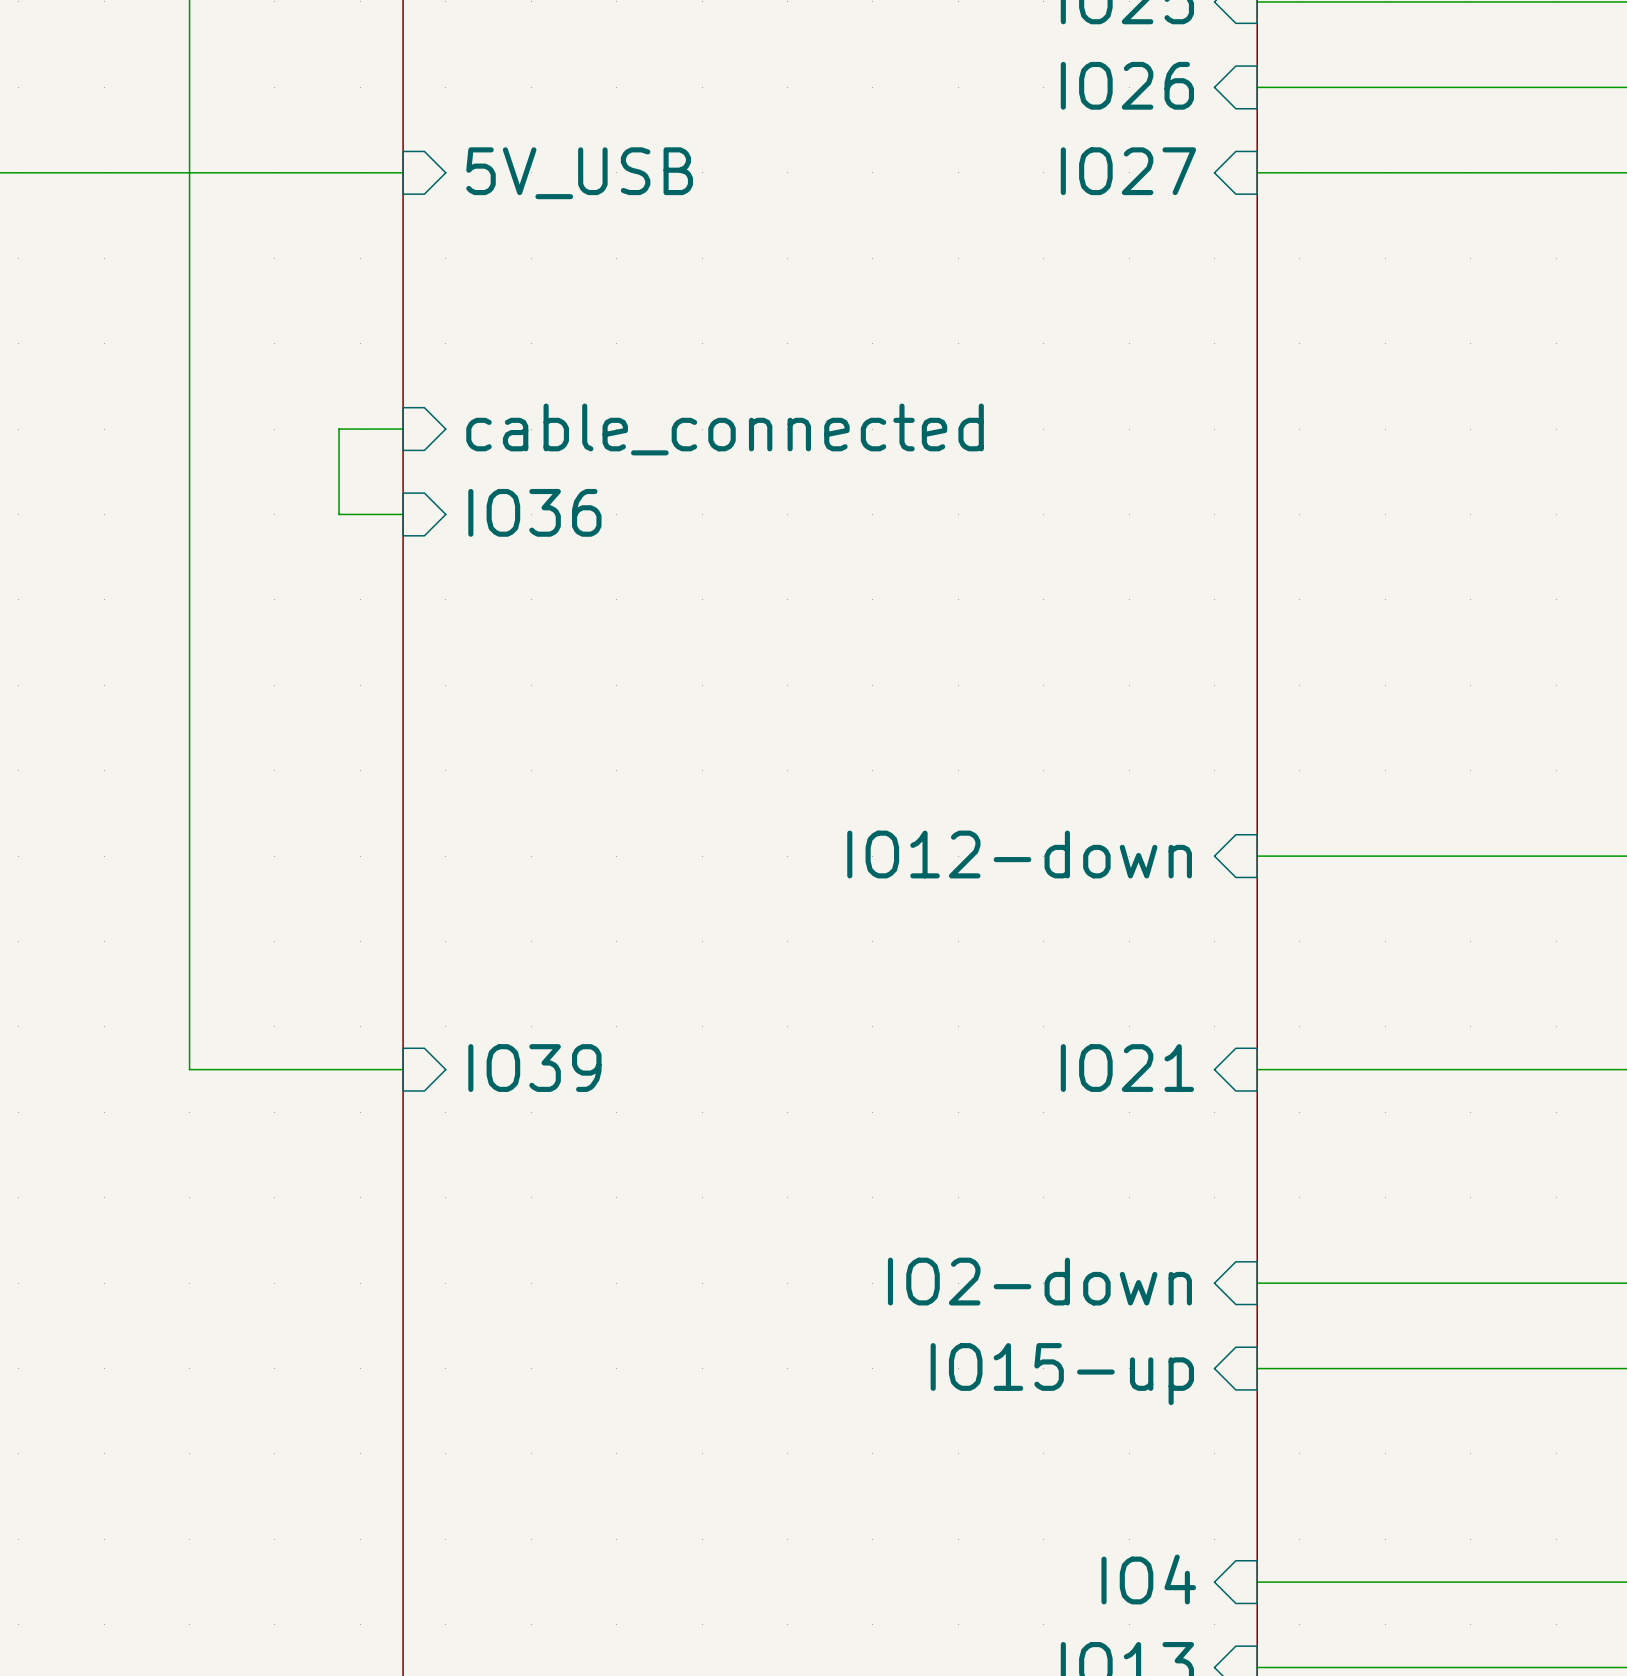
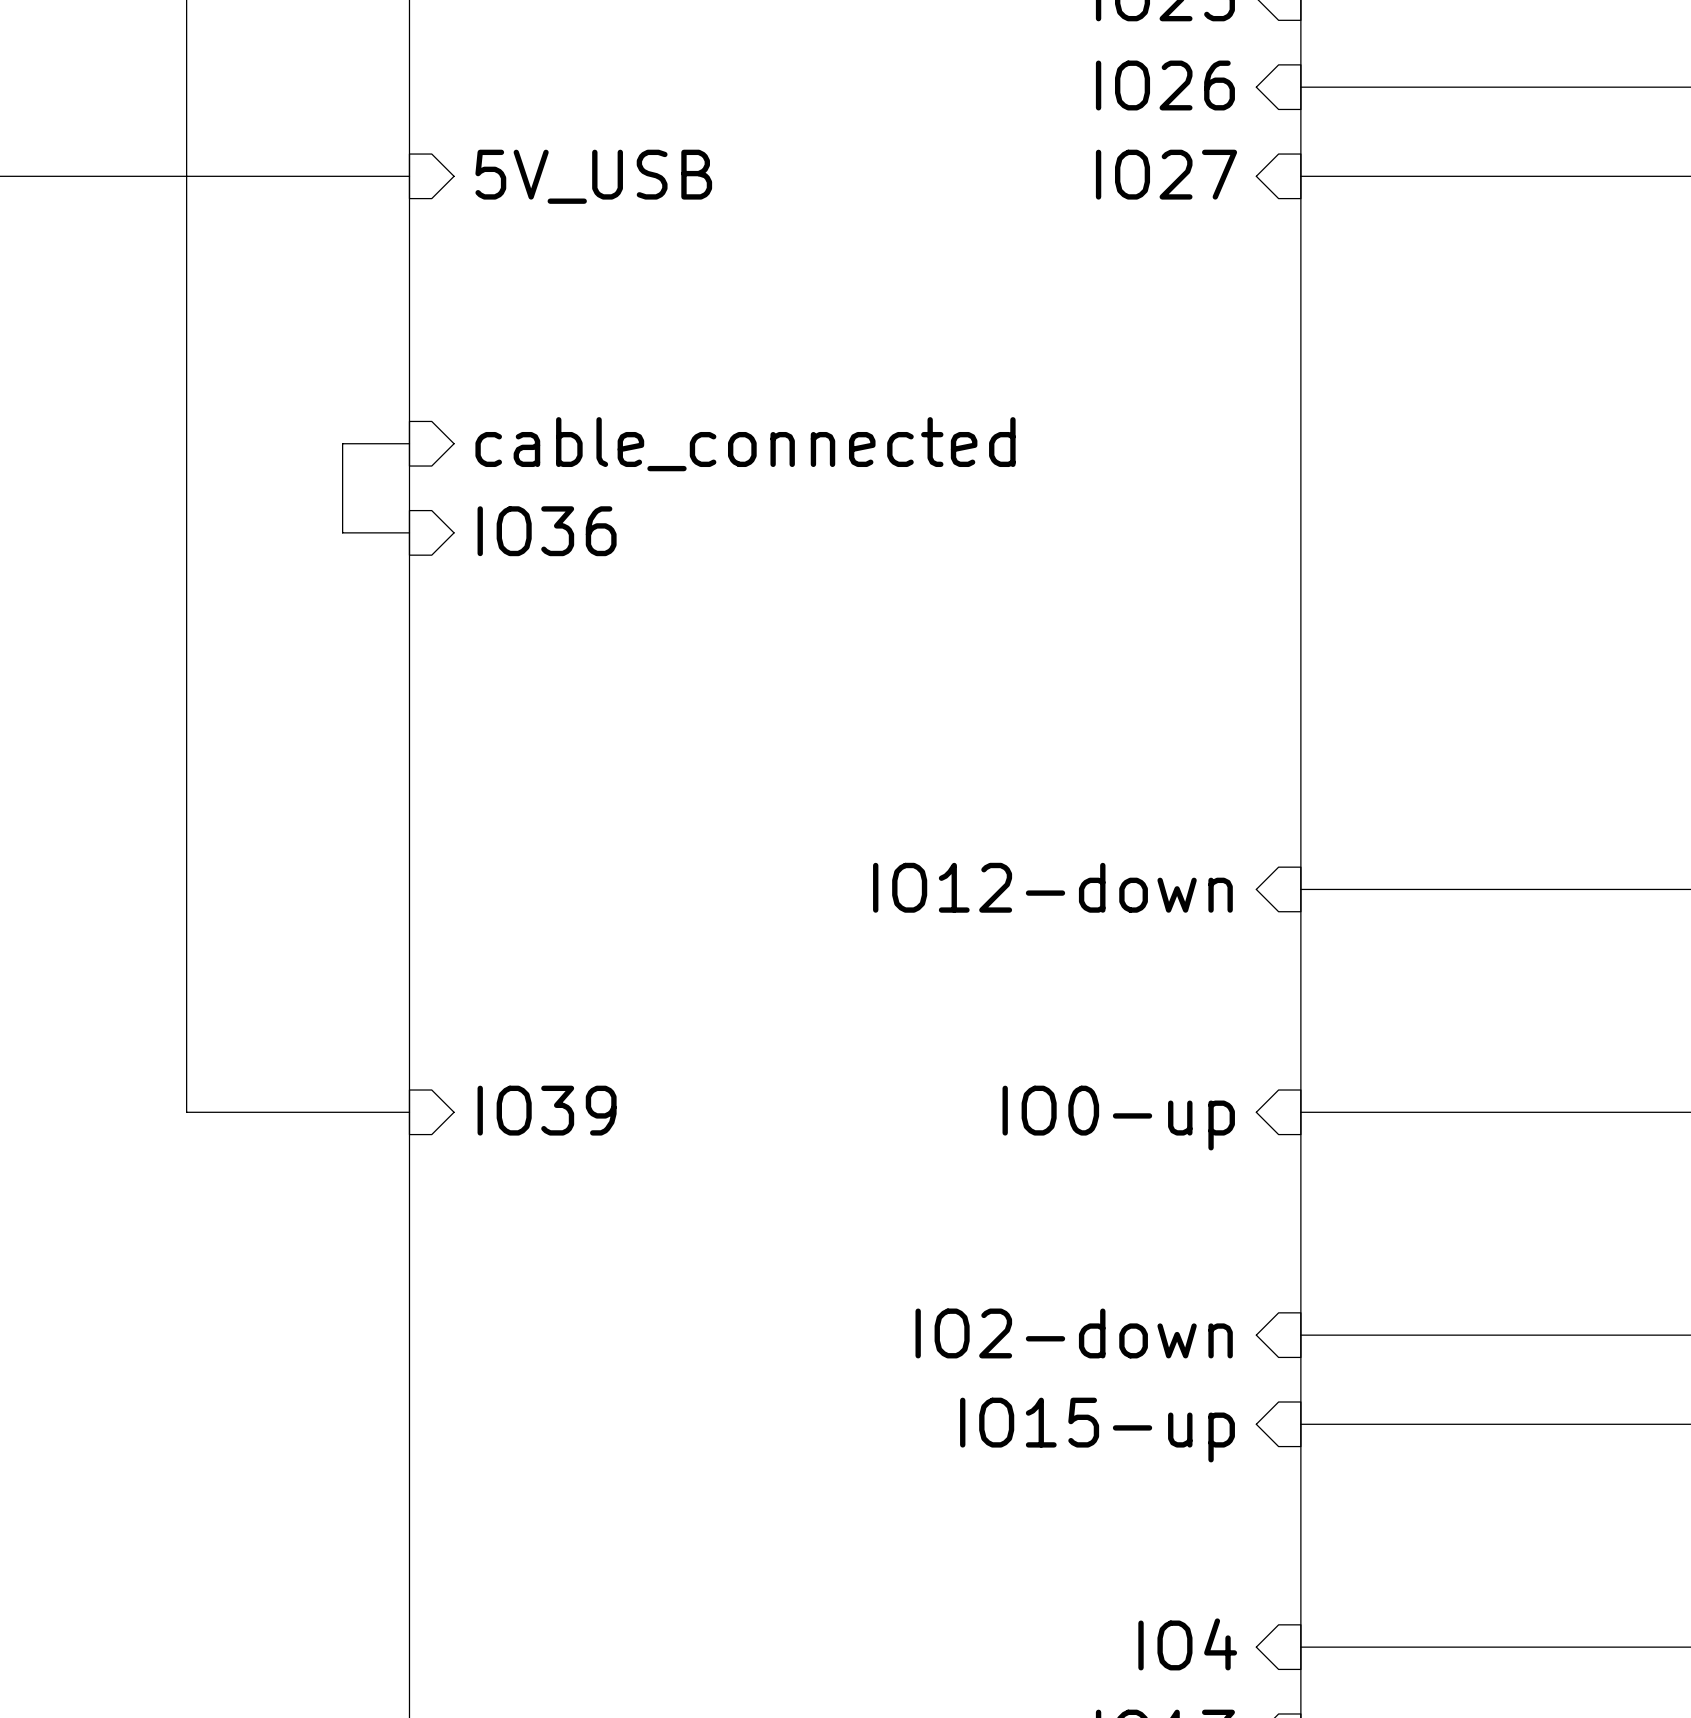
sheet pin: IO21 (1127, 1068) -> IO0-up (1118, 1118)

